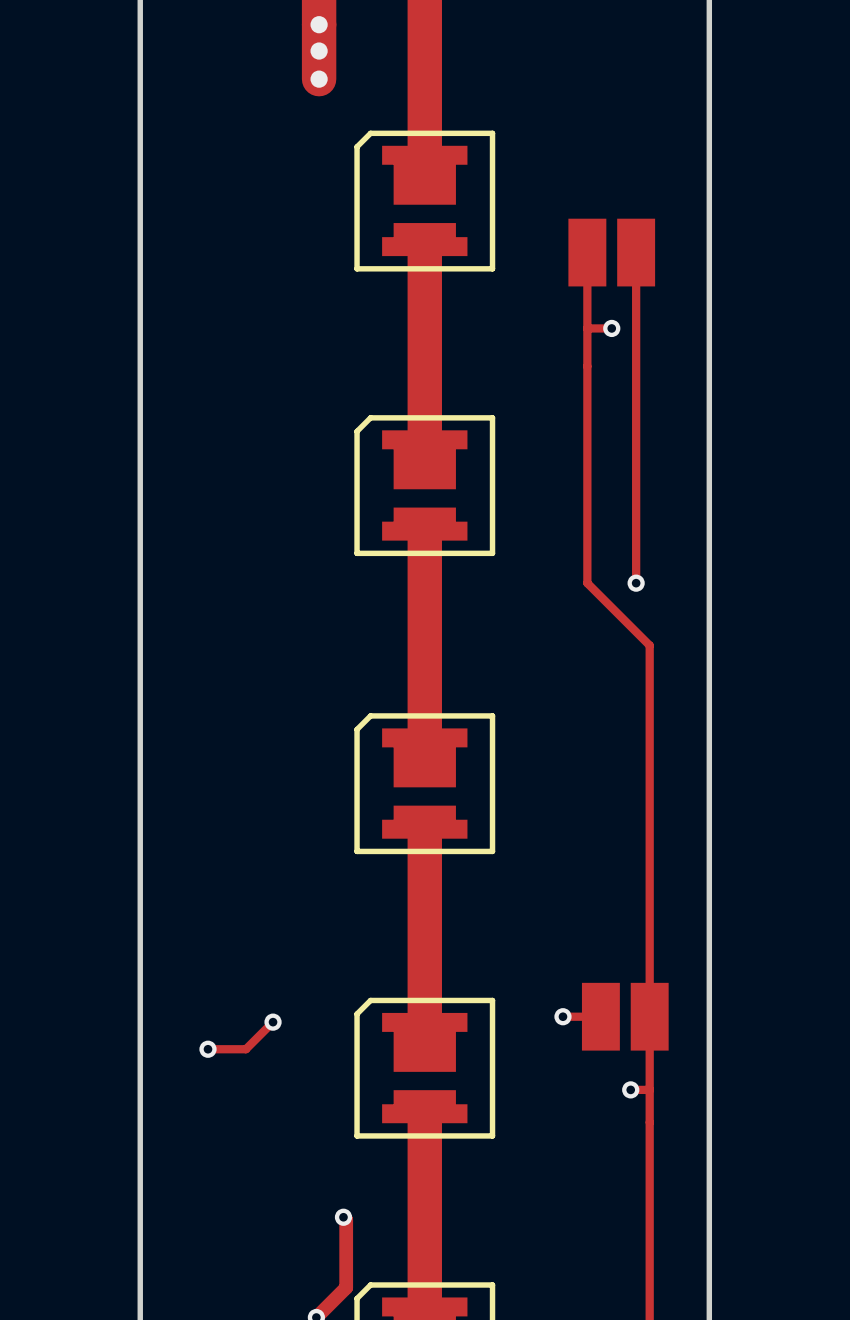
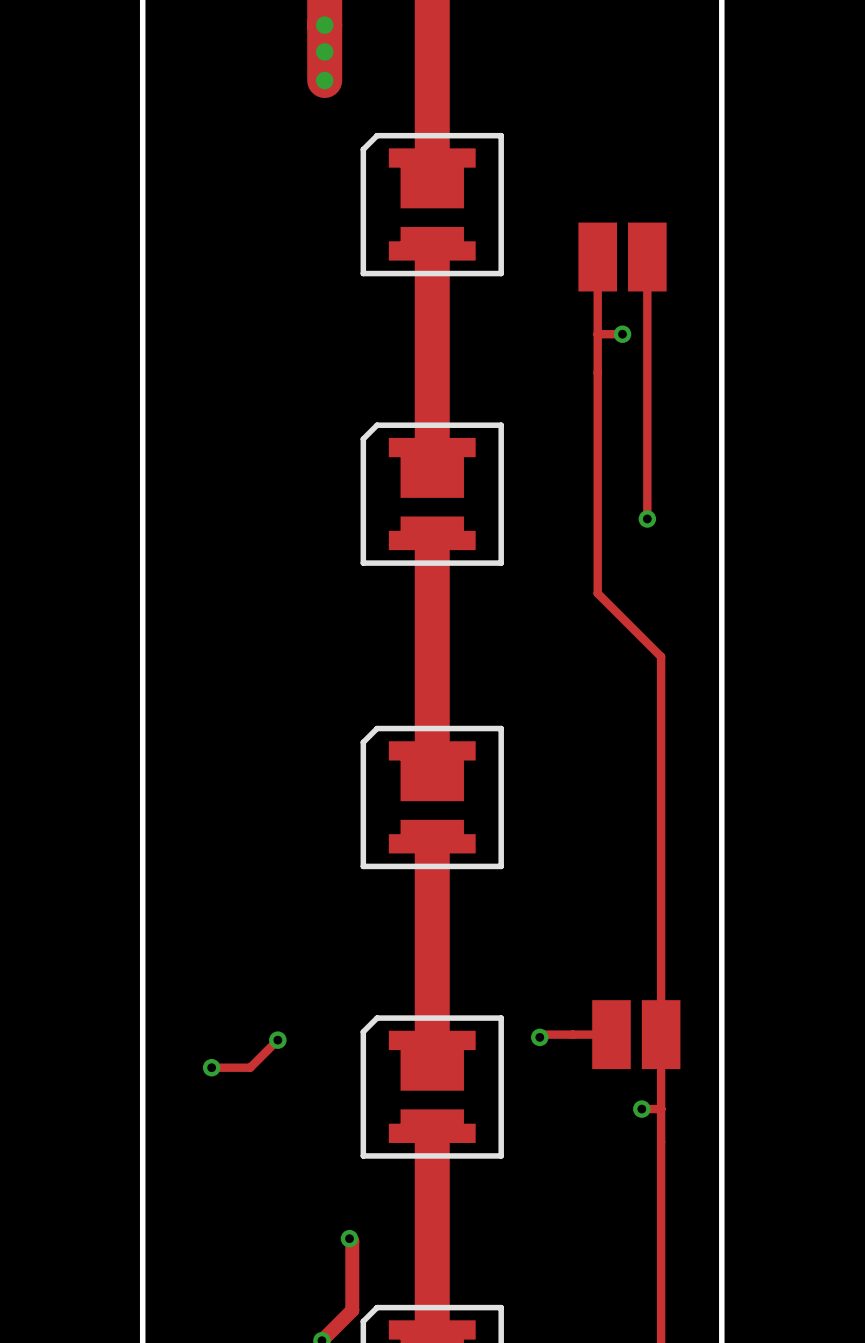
track: (636, 510) (636, 583) -> none
via position: (636, 583) -> (647, 518)
track: none -> (572, 1034) (542, 1034) (539, 1037)
via position: (562, 1016) -> (539, 1037)

